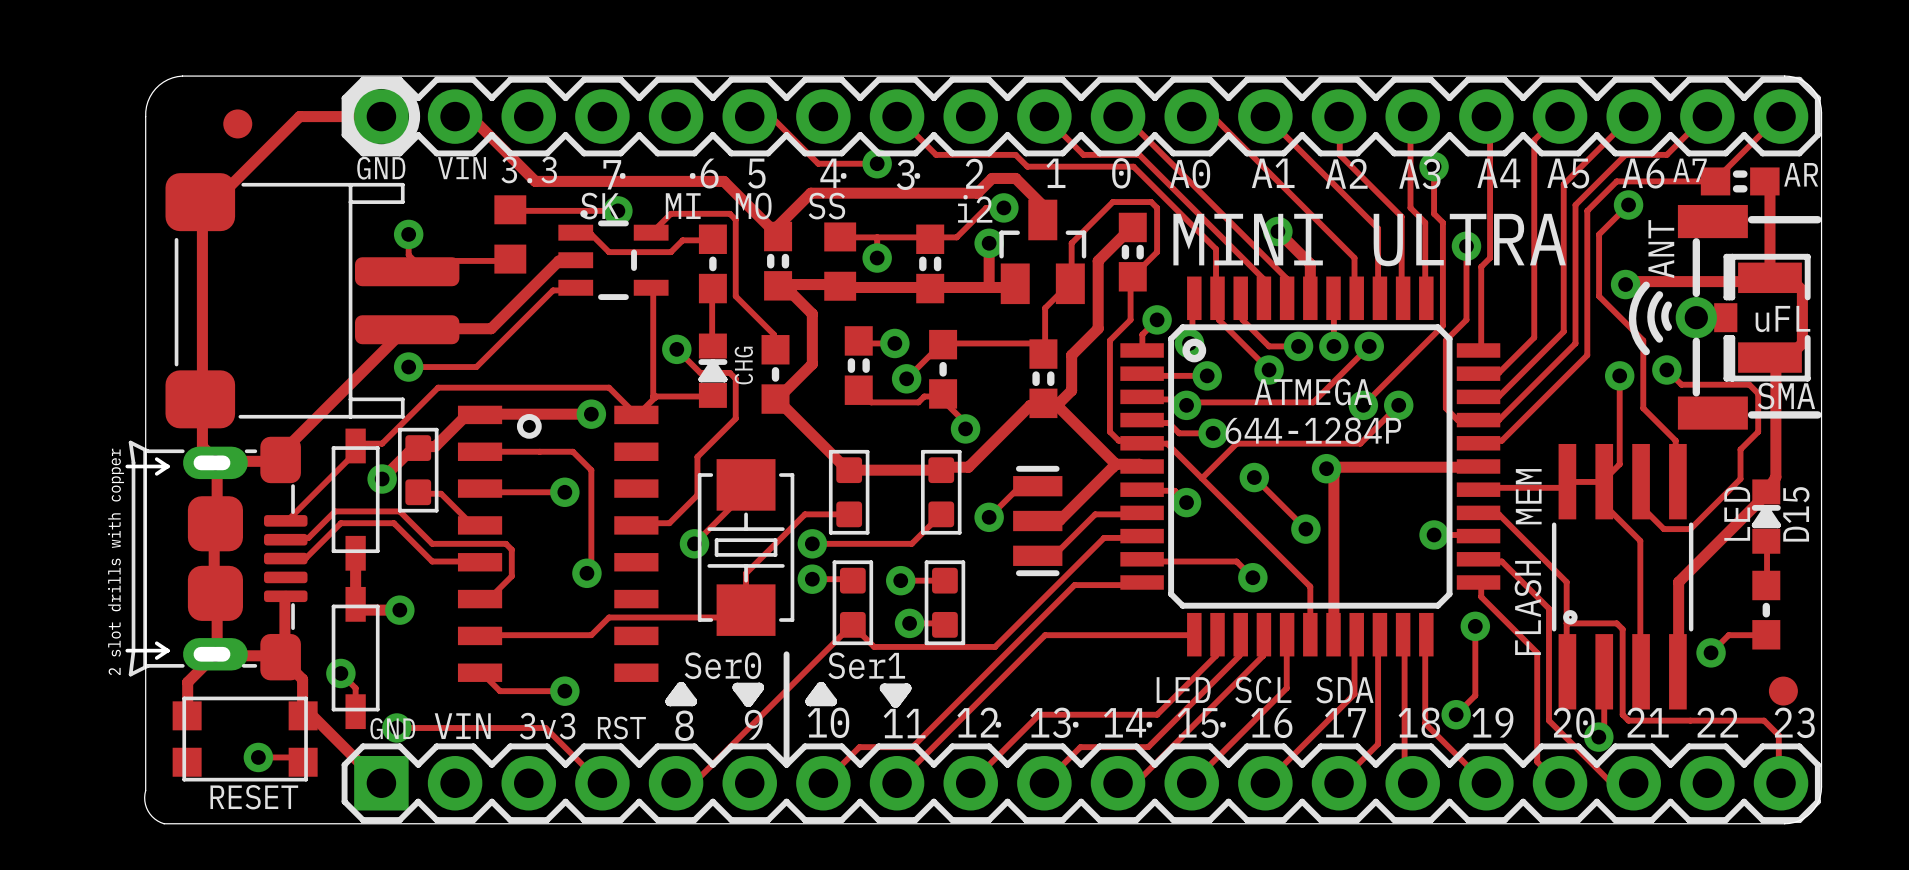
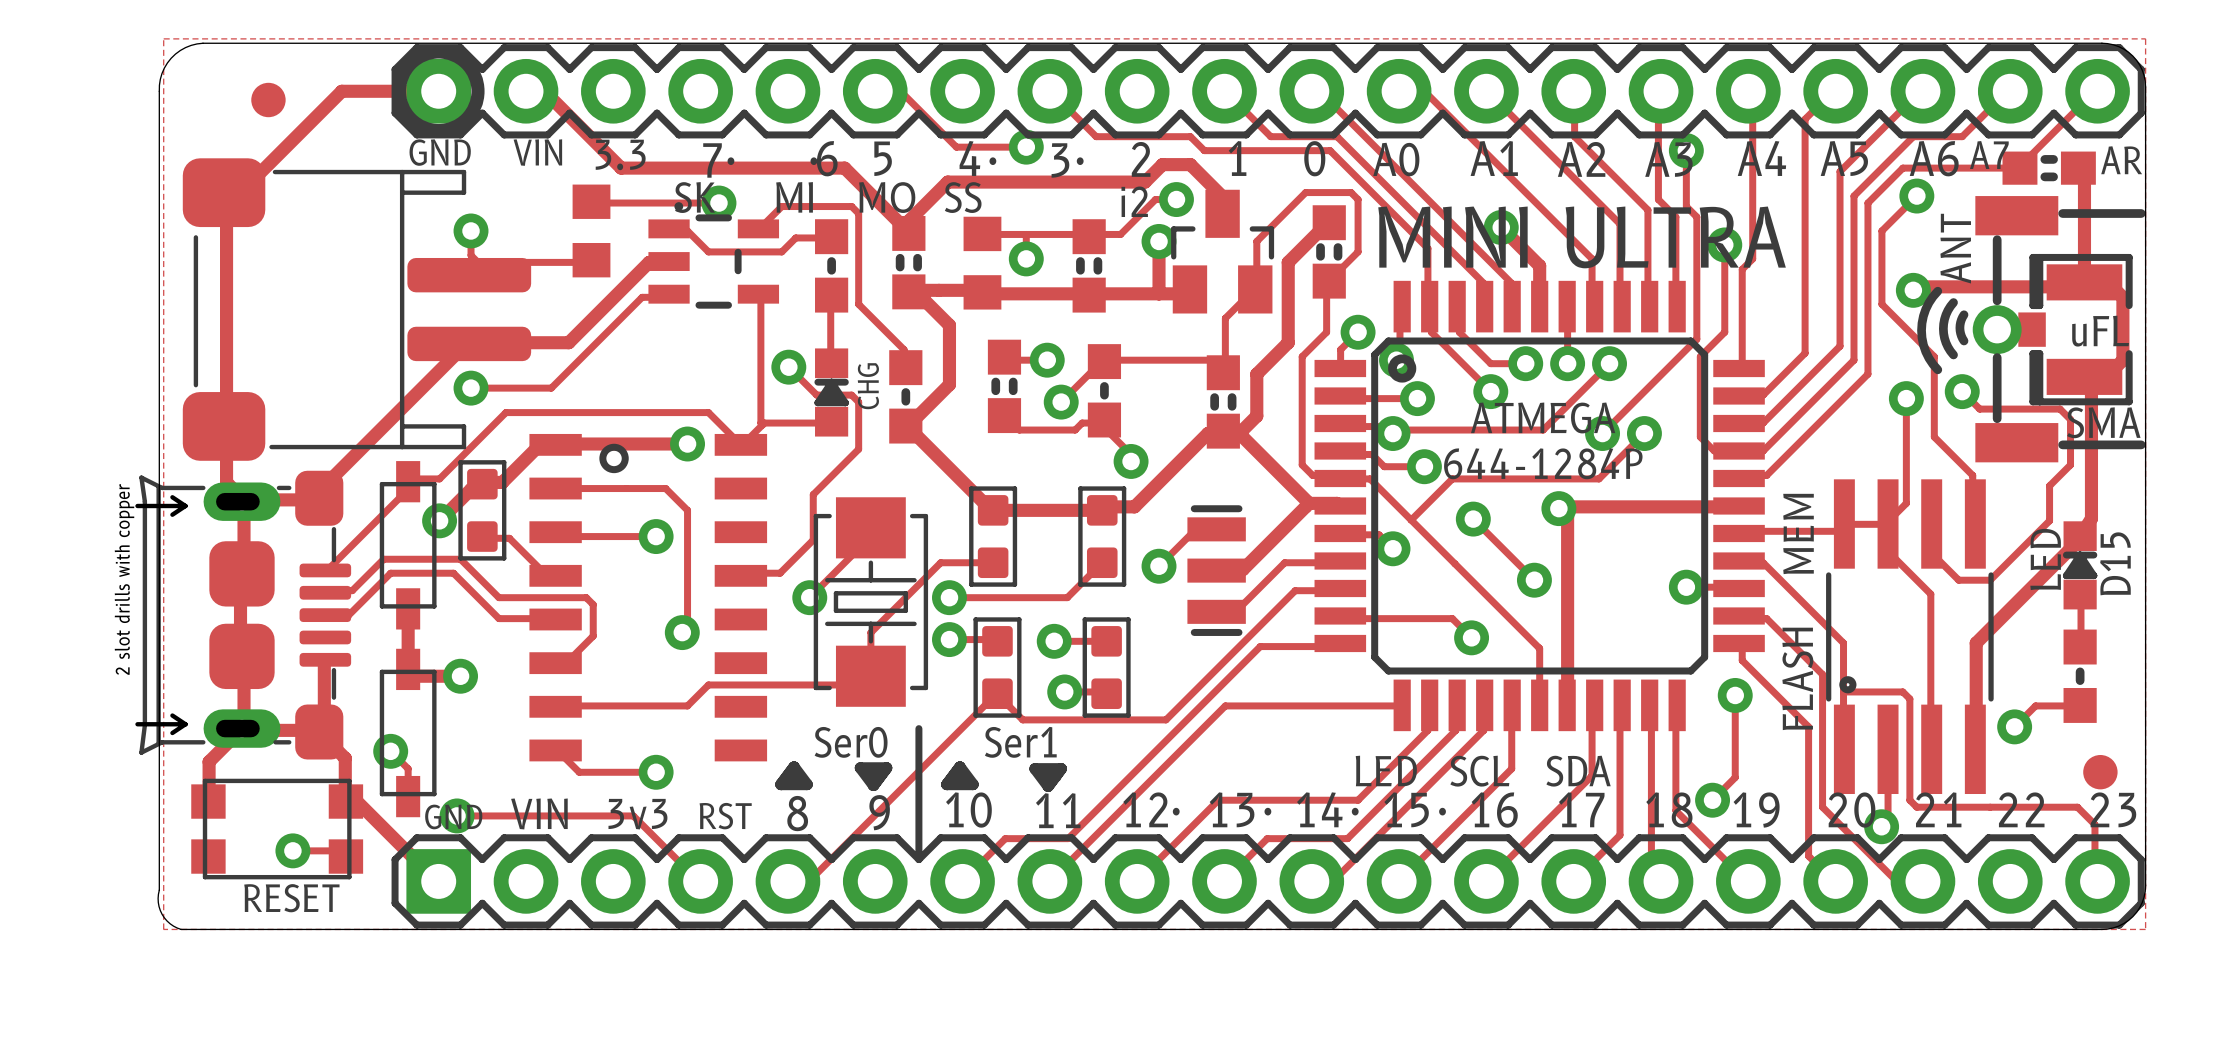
zone outline: none -> (163, 38) (163, 929) (2145, 929) (2145, 38) (163, 38)

